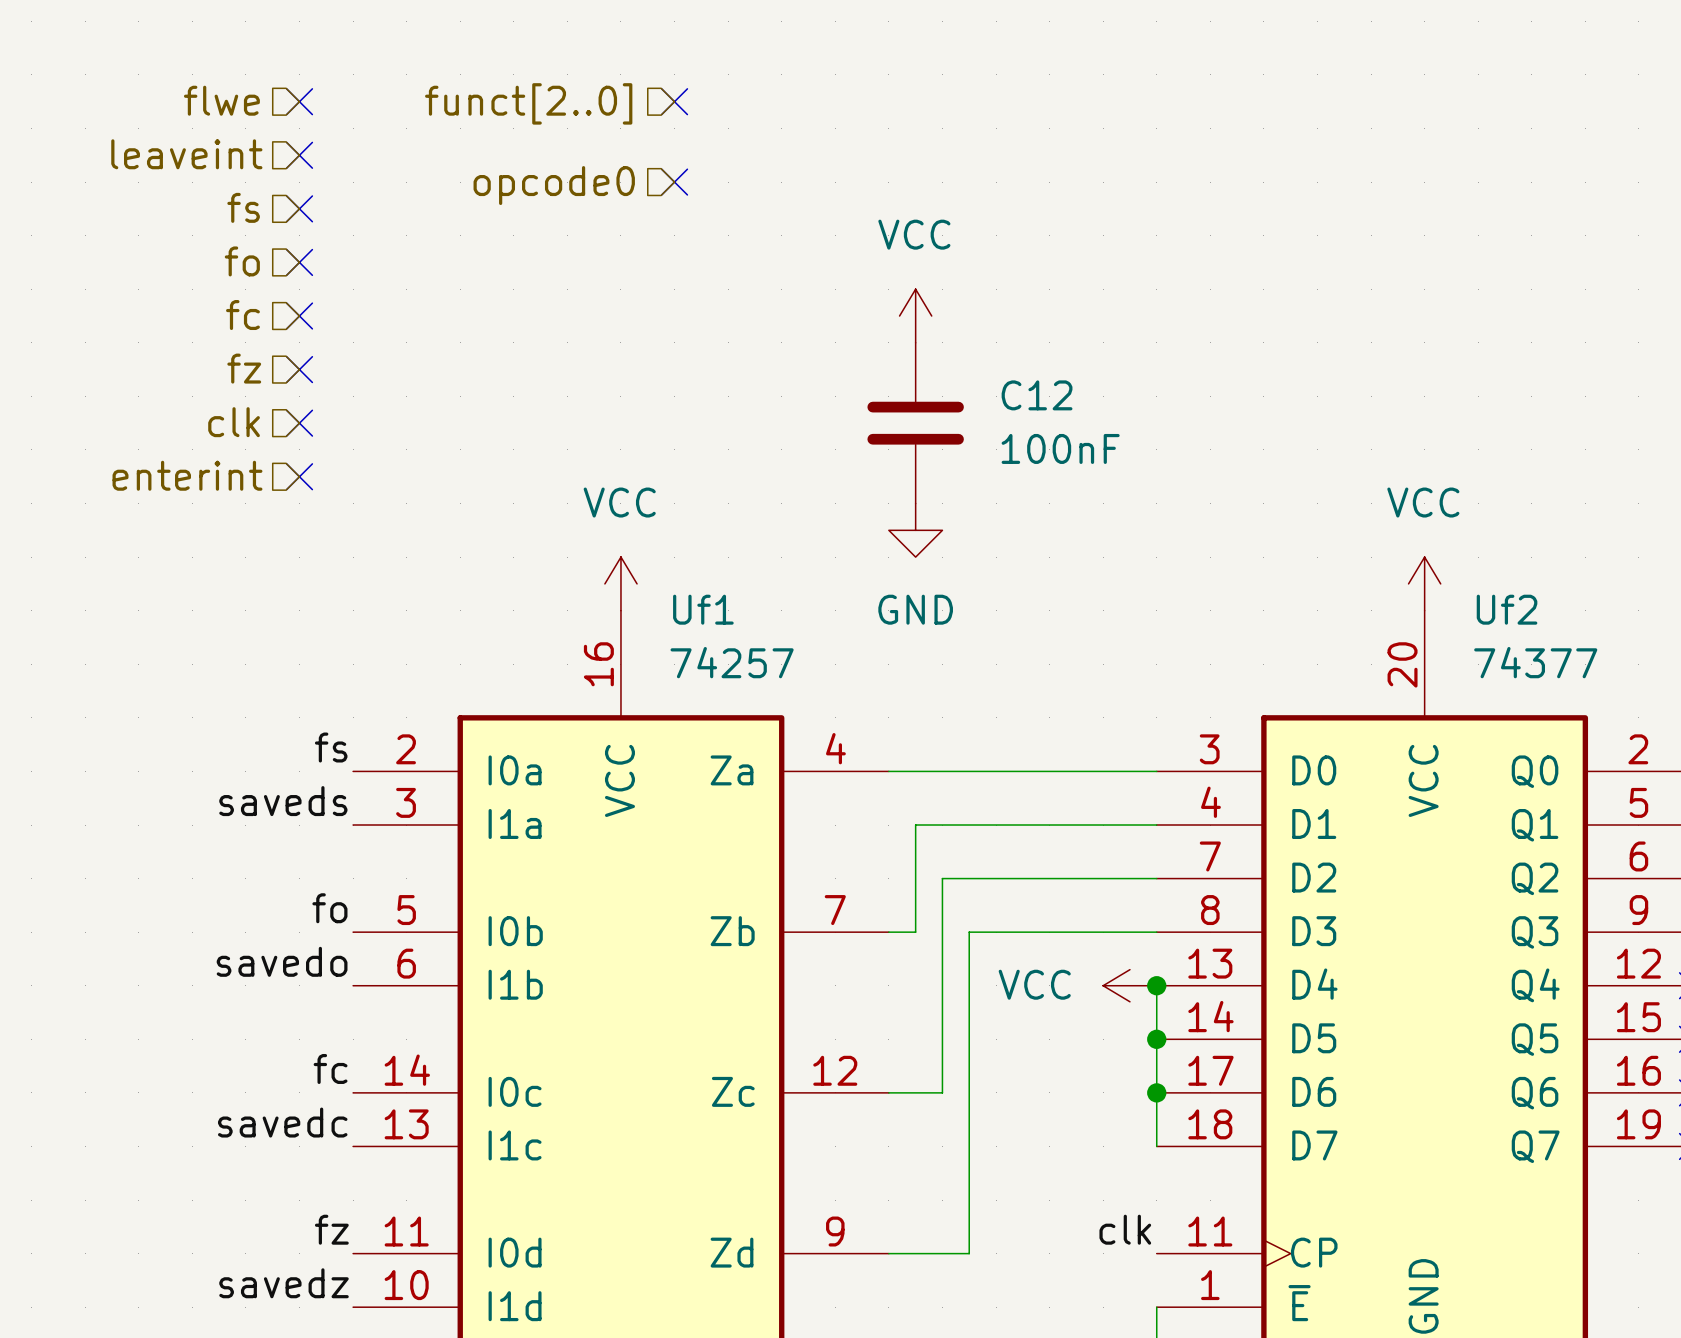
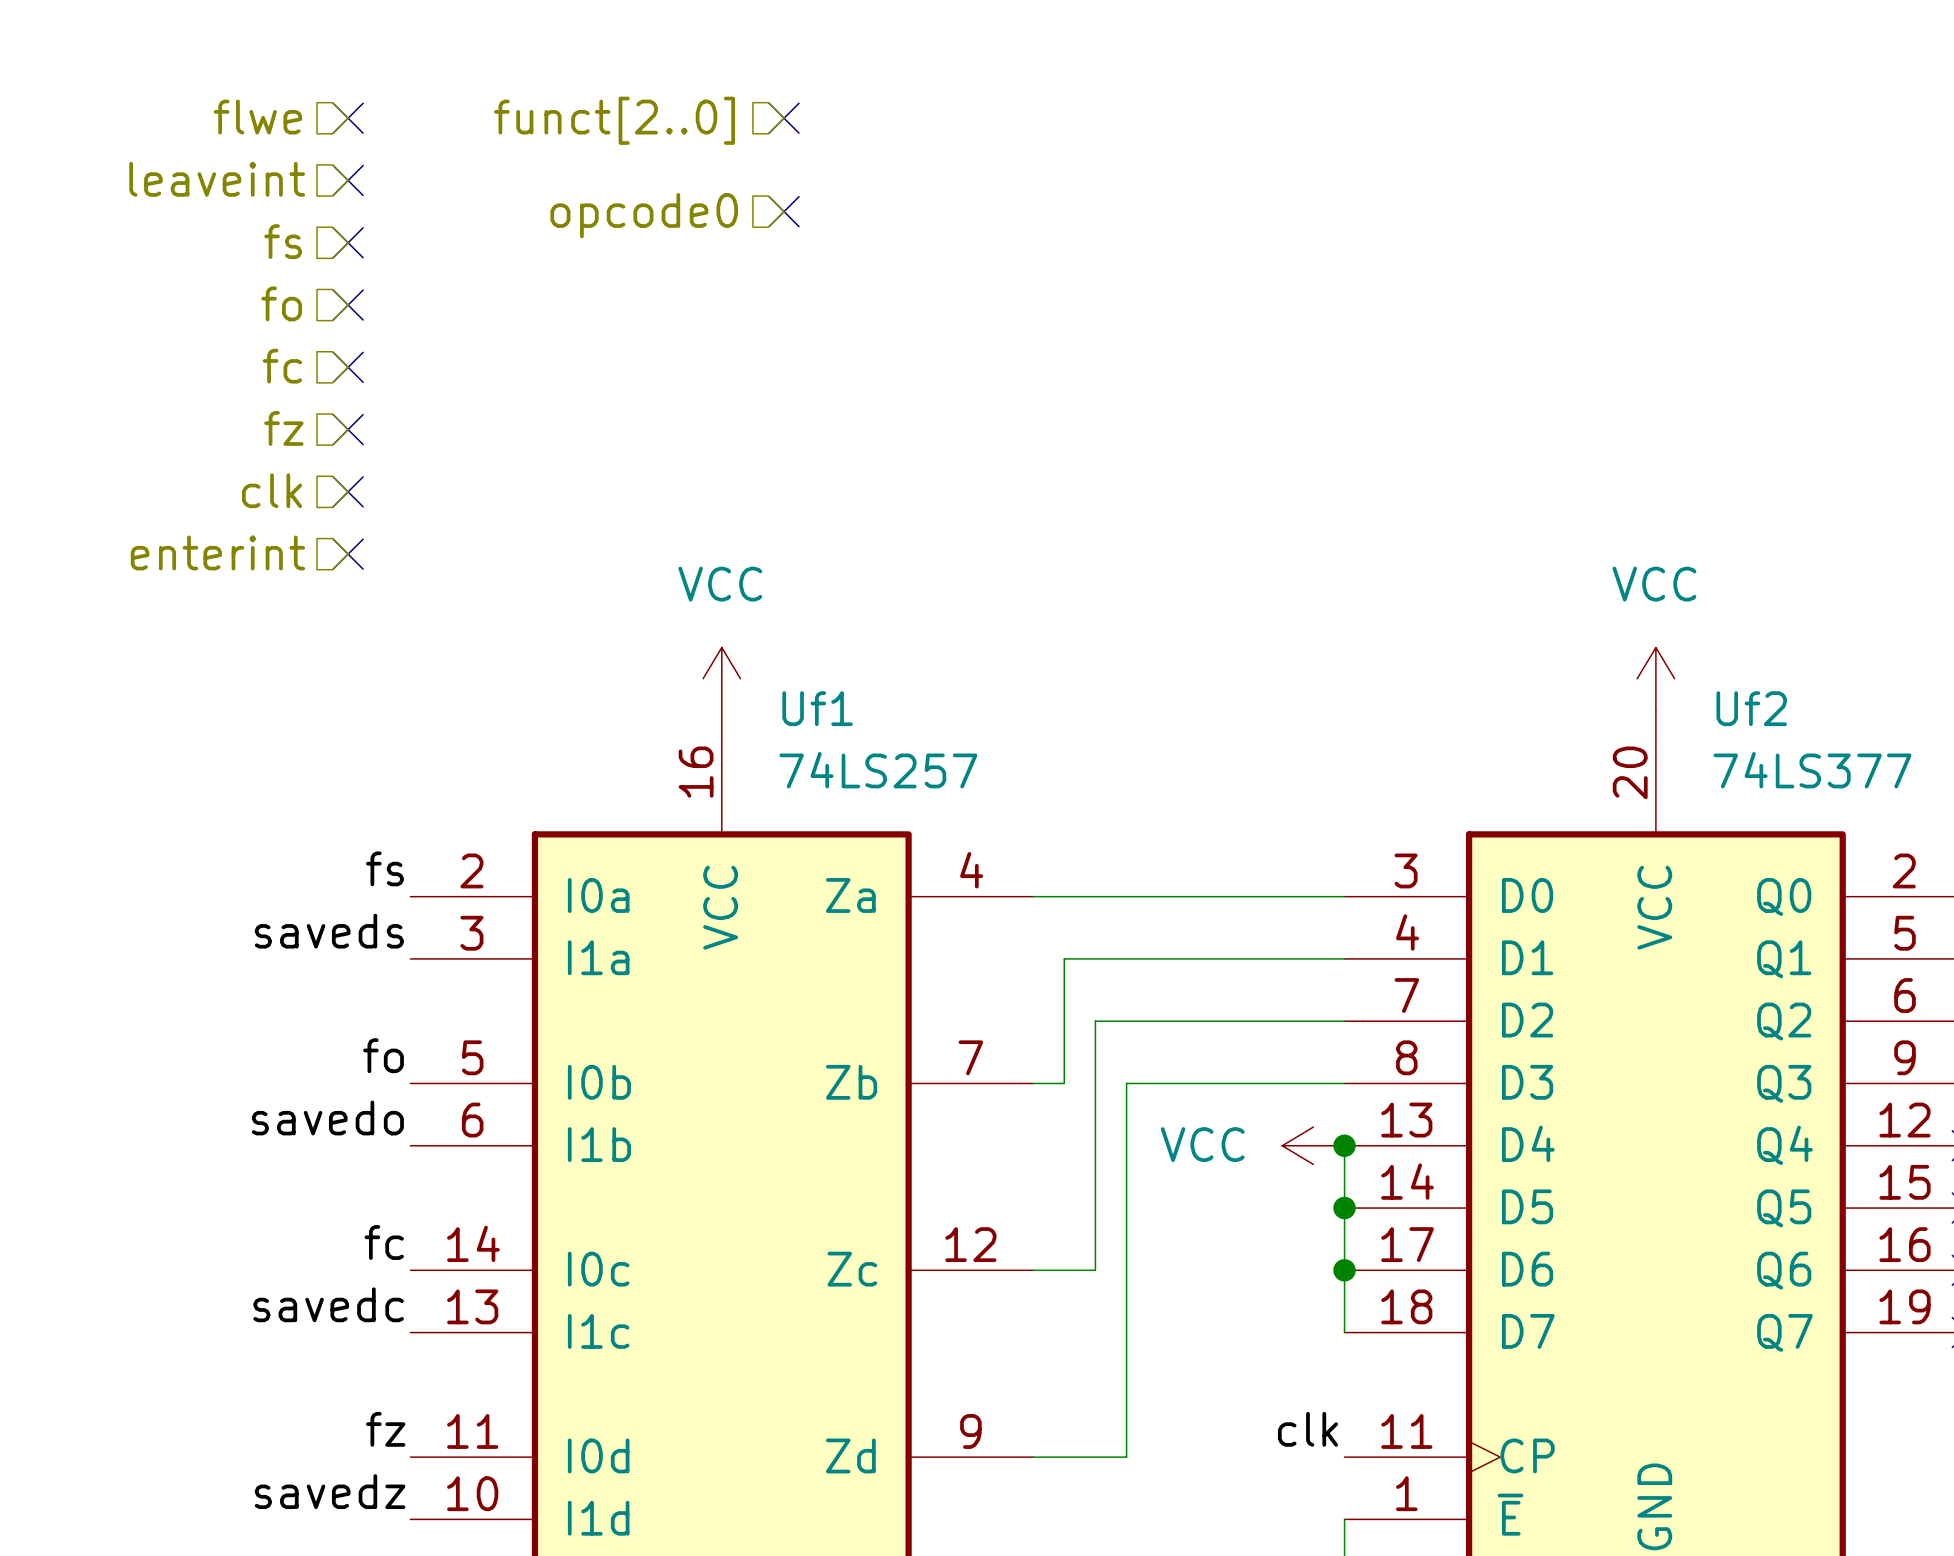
power symbol: VCC (915, 316) -> none
C12: 100nF (915, 423) -> none
power symbol: GND (915, 530) -> none
Uf1 value: 74257 (732, 662) -> 74LS257 (878, 770)
Uf2 value: 74377 (1535, 662) -> 74LS377 (1812, 770)

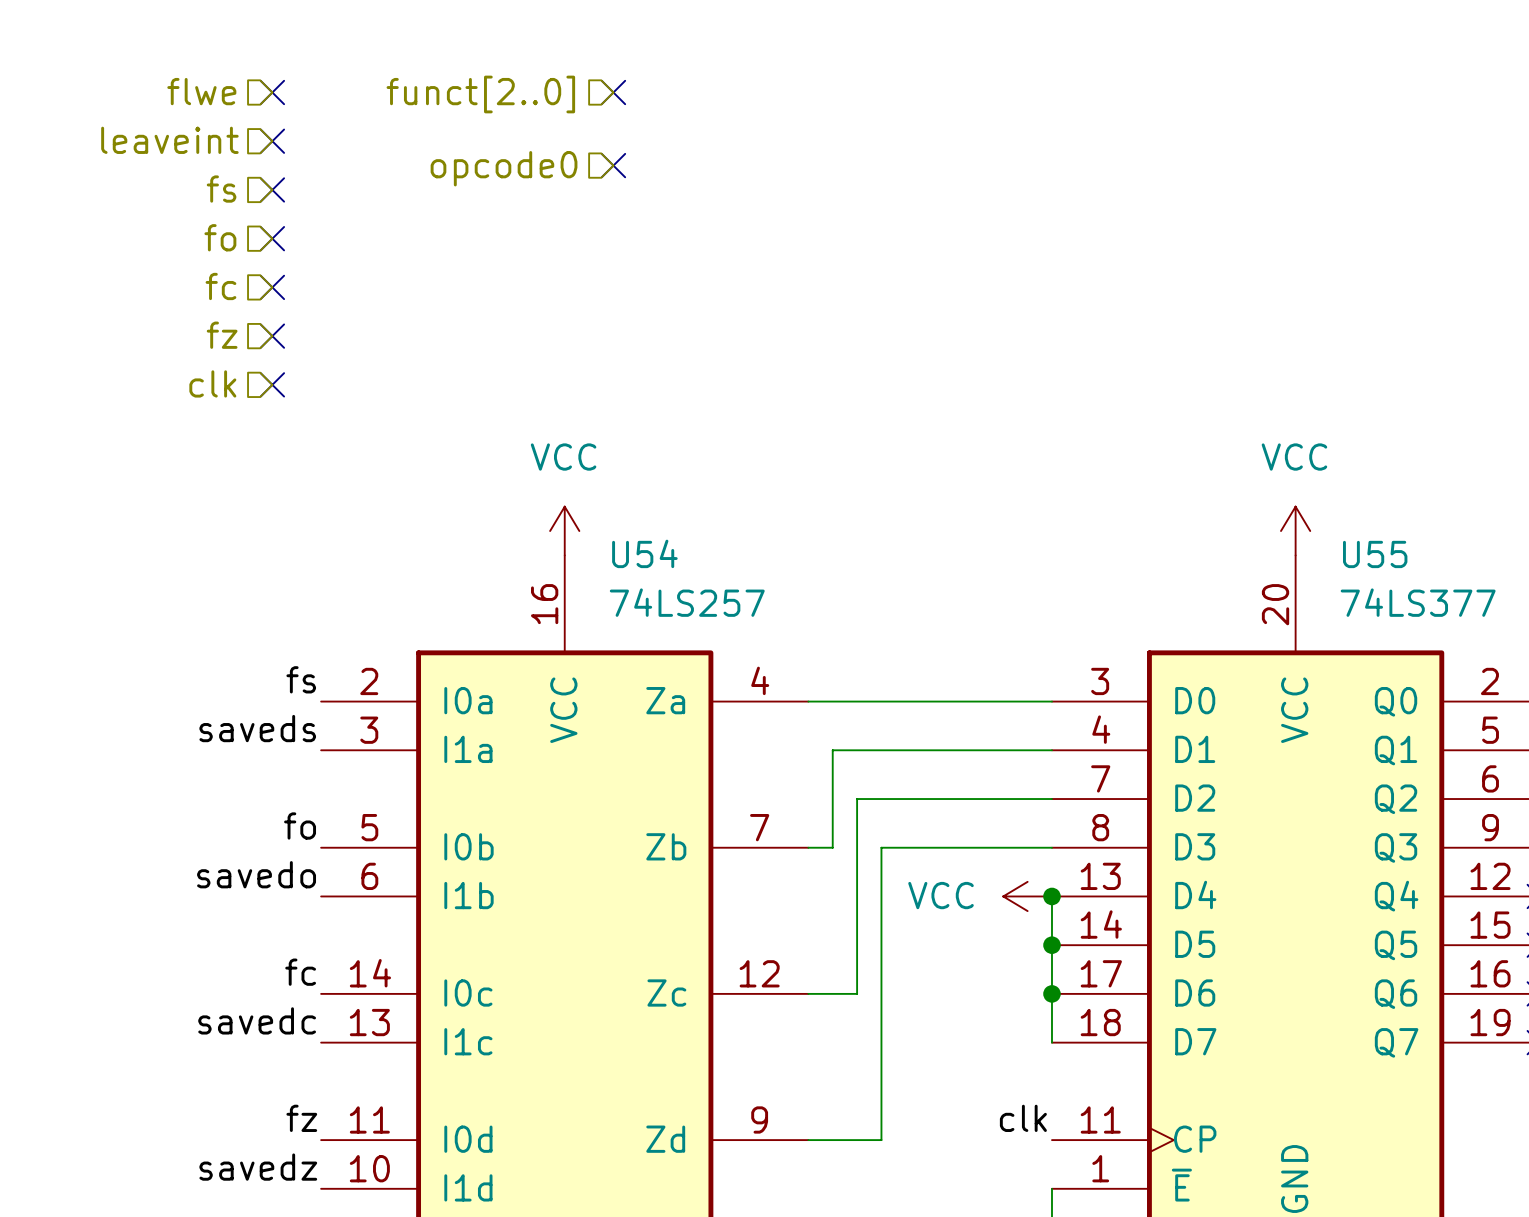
hierarchical label: enterint (217, 552) -> none
no-connect mark: (348, 554) -> none
Uf1 name: Uf1 (817, 708) -> U54 (644, 553)
Uf2 name: Uf2 (1751, 708) -> U55 (1375, 554)

